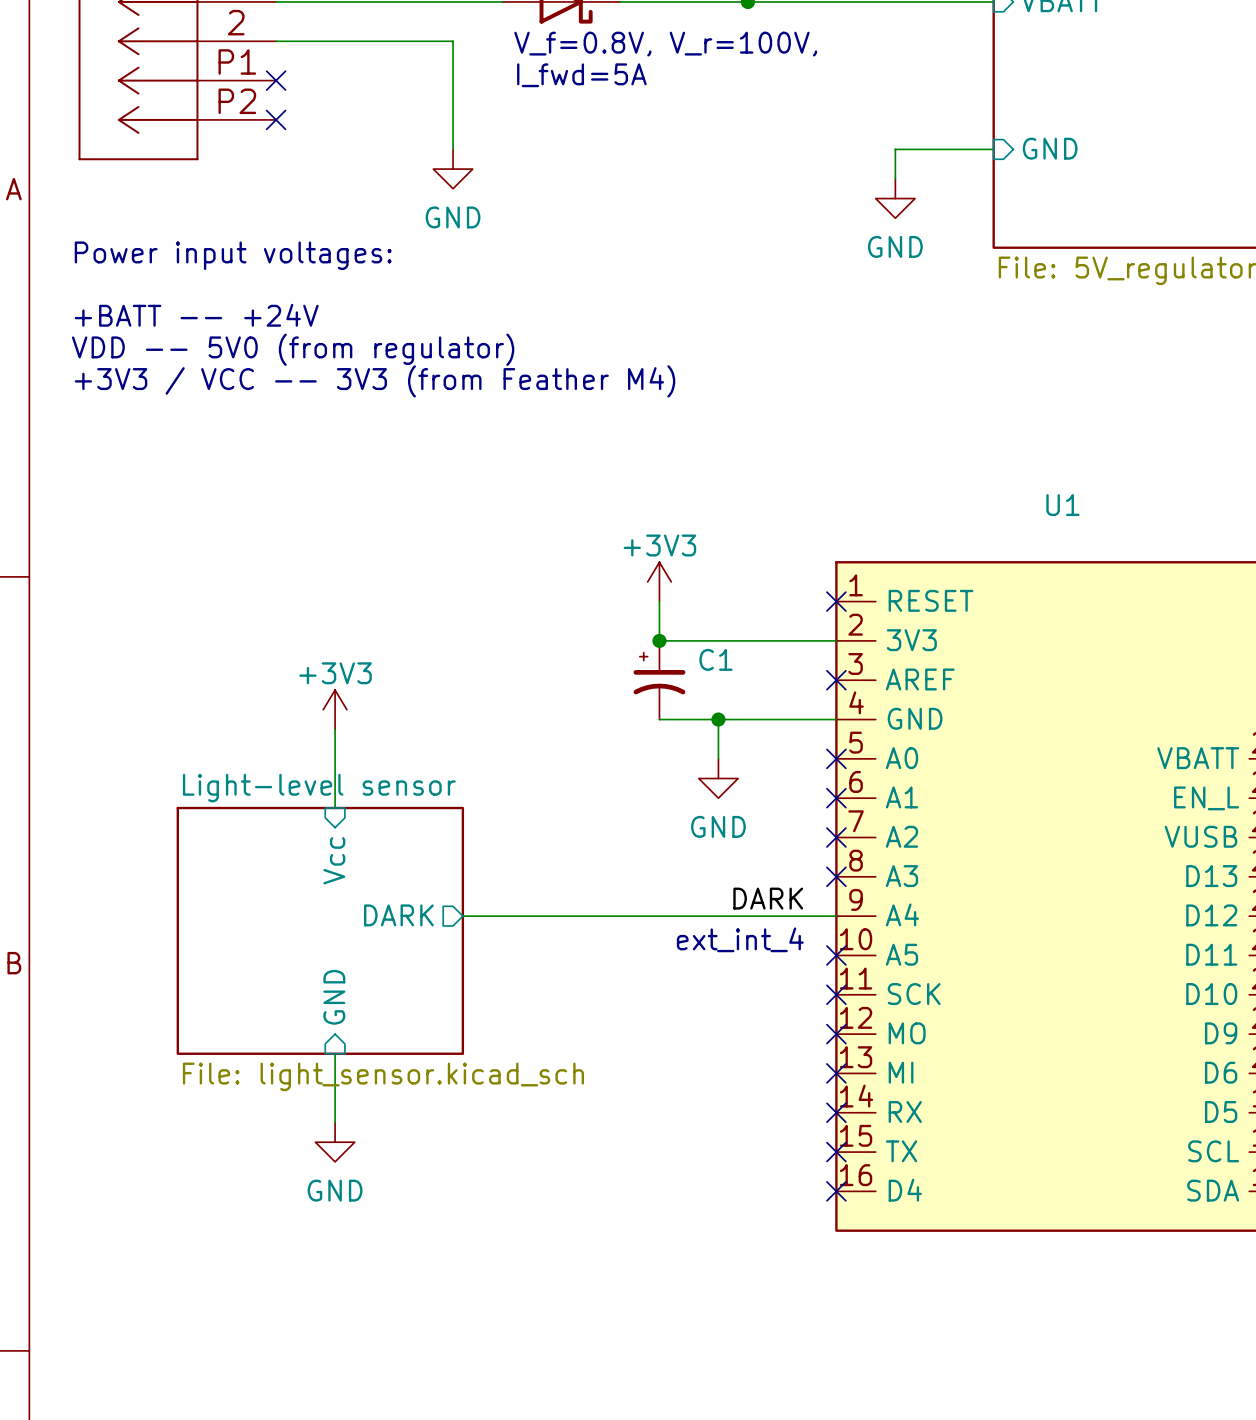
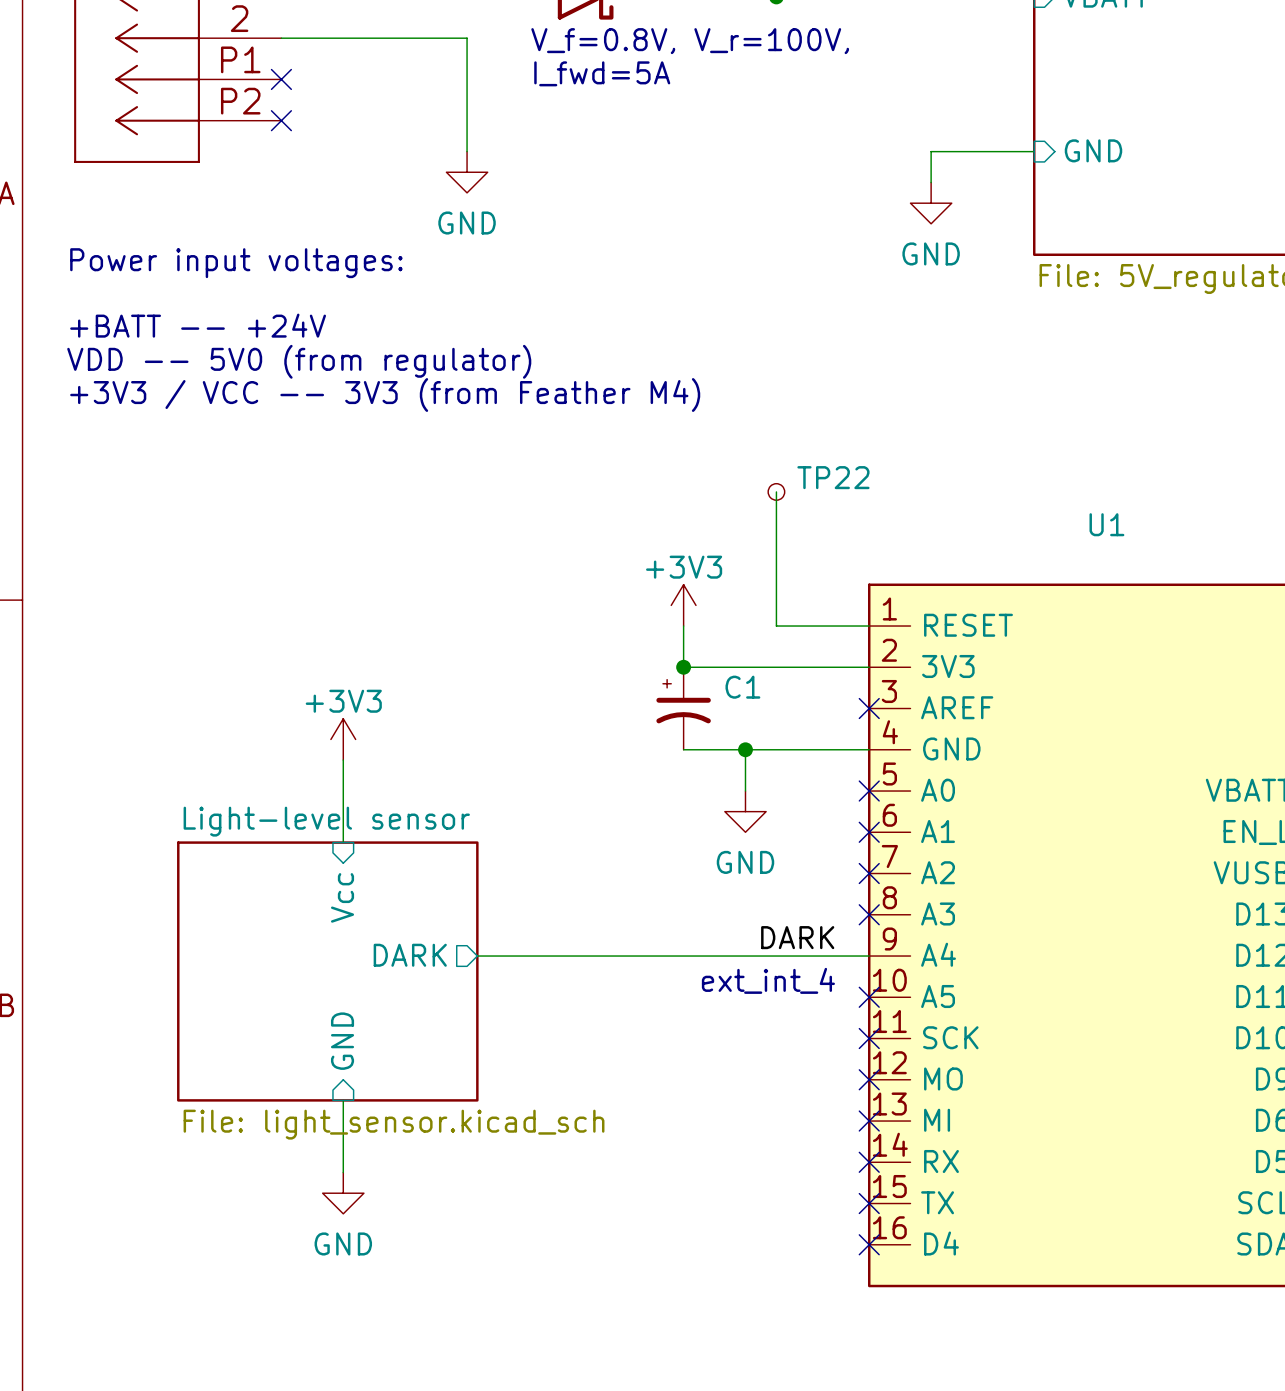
wire: none -> (776, 491) (776, 626) (869, 626)
TP22: none -> (776, 491)
no-connect mark: (836, 601) -> none

